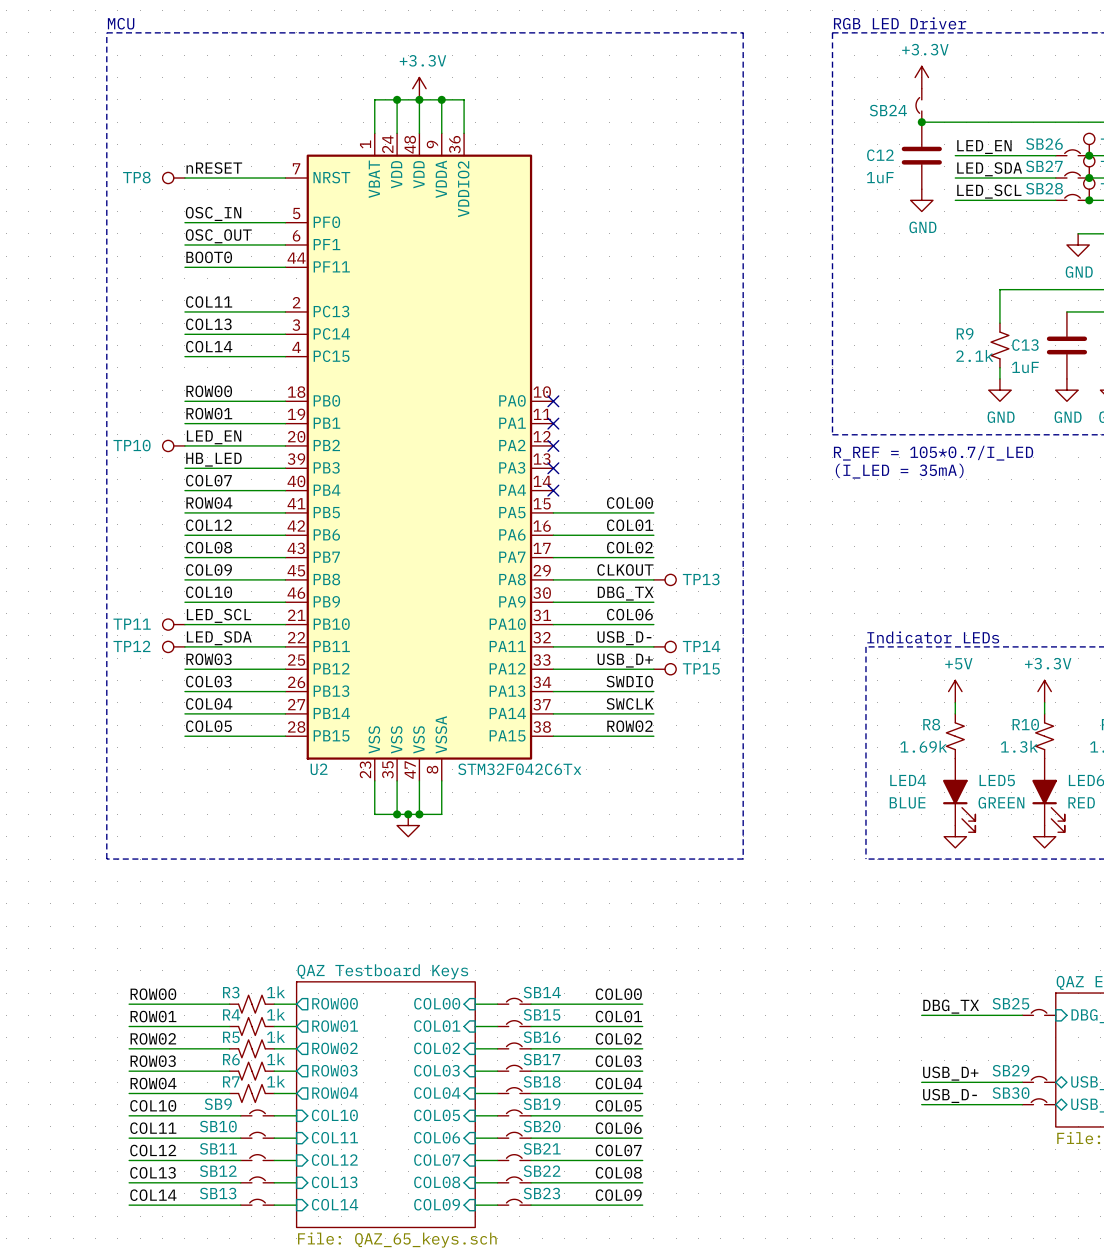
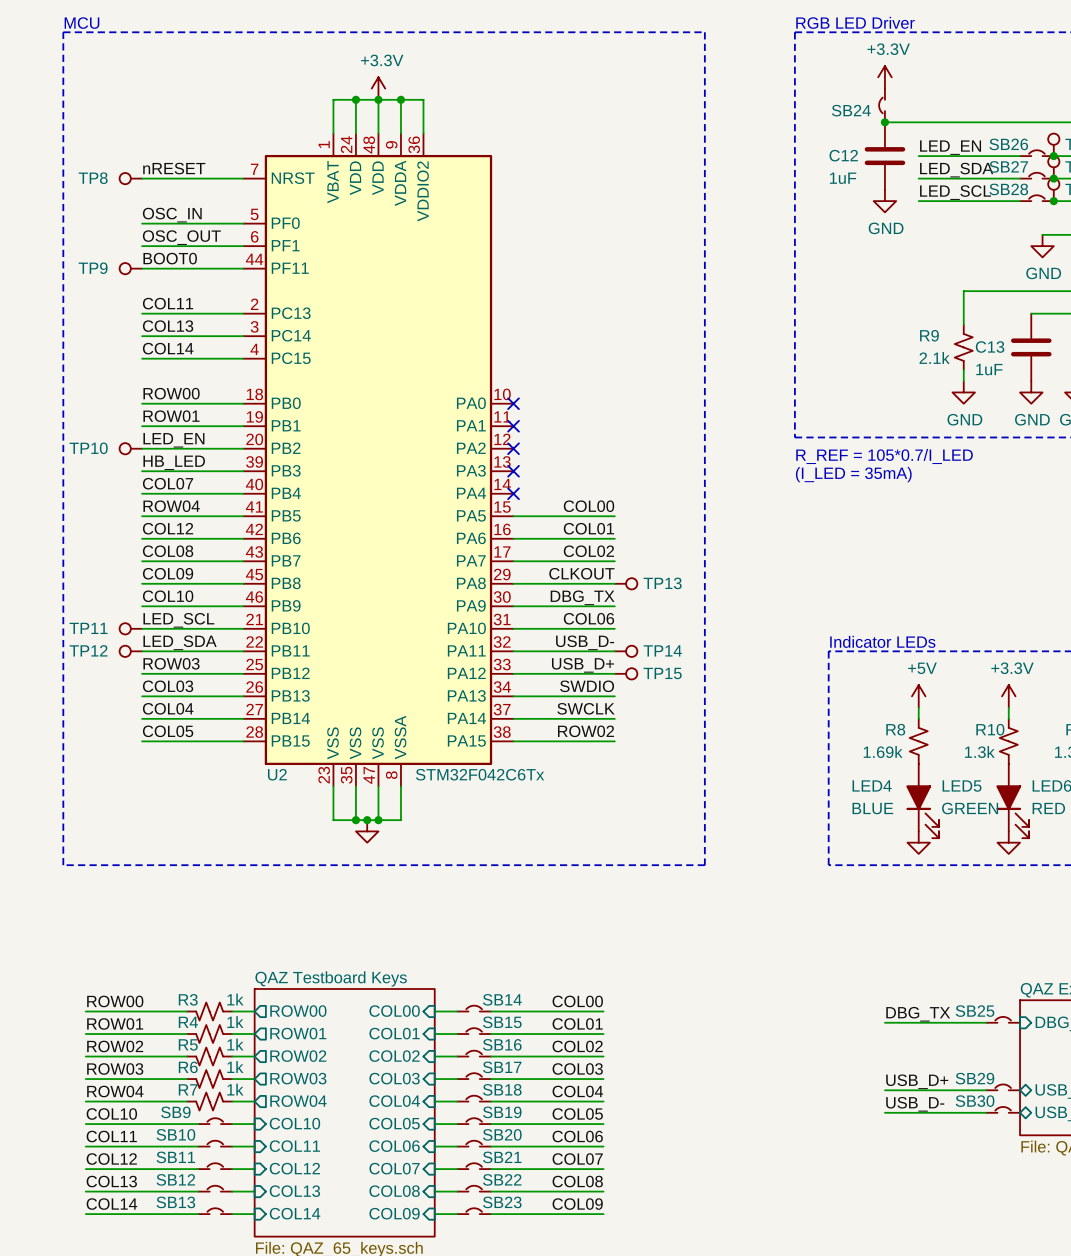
TP9: none -> (130, 268)

